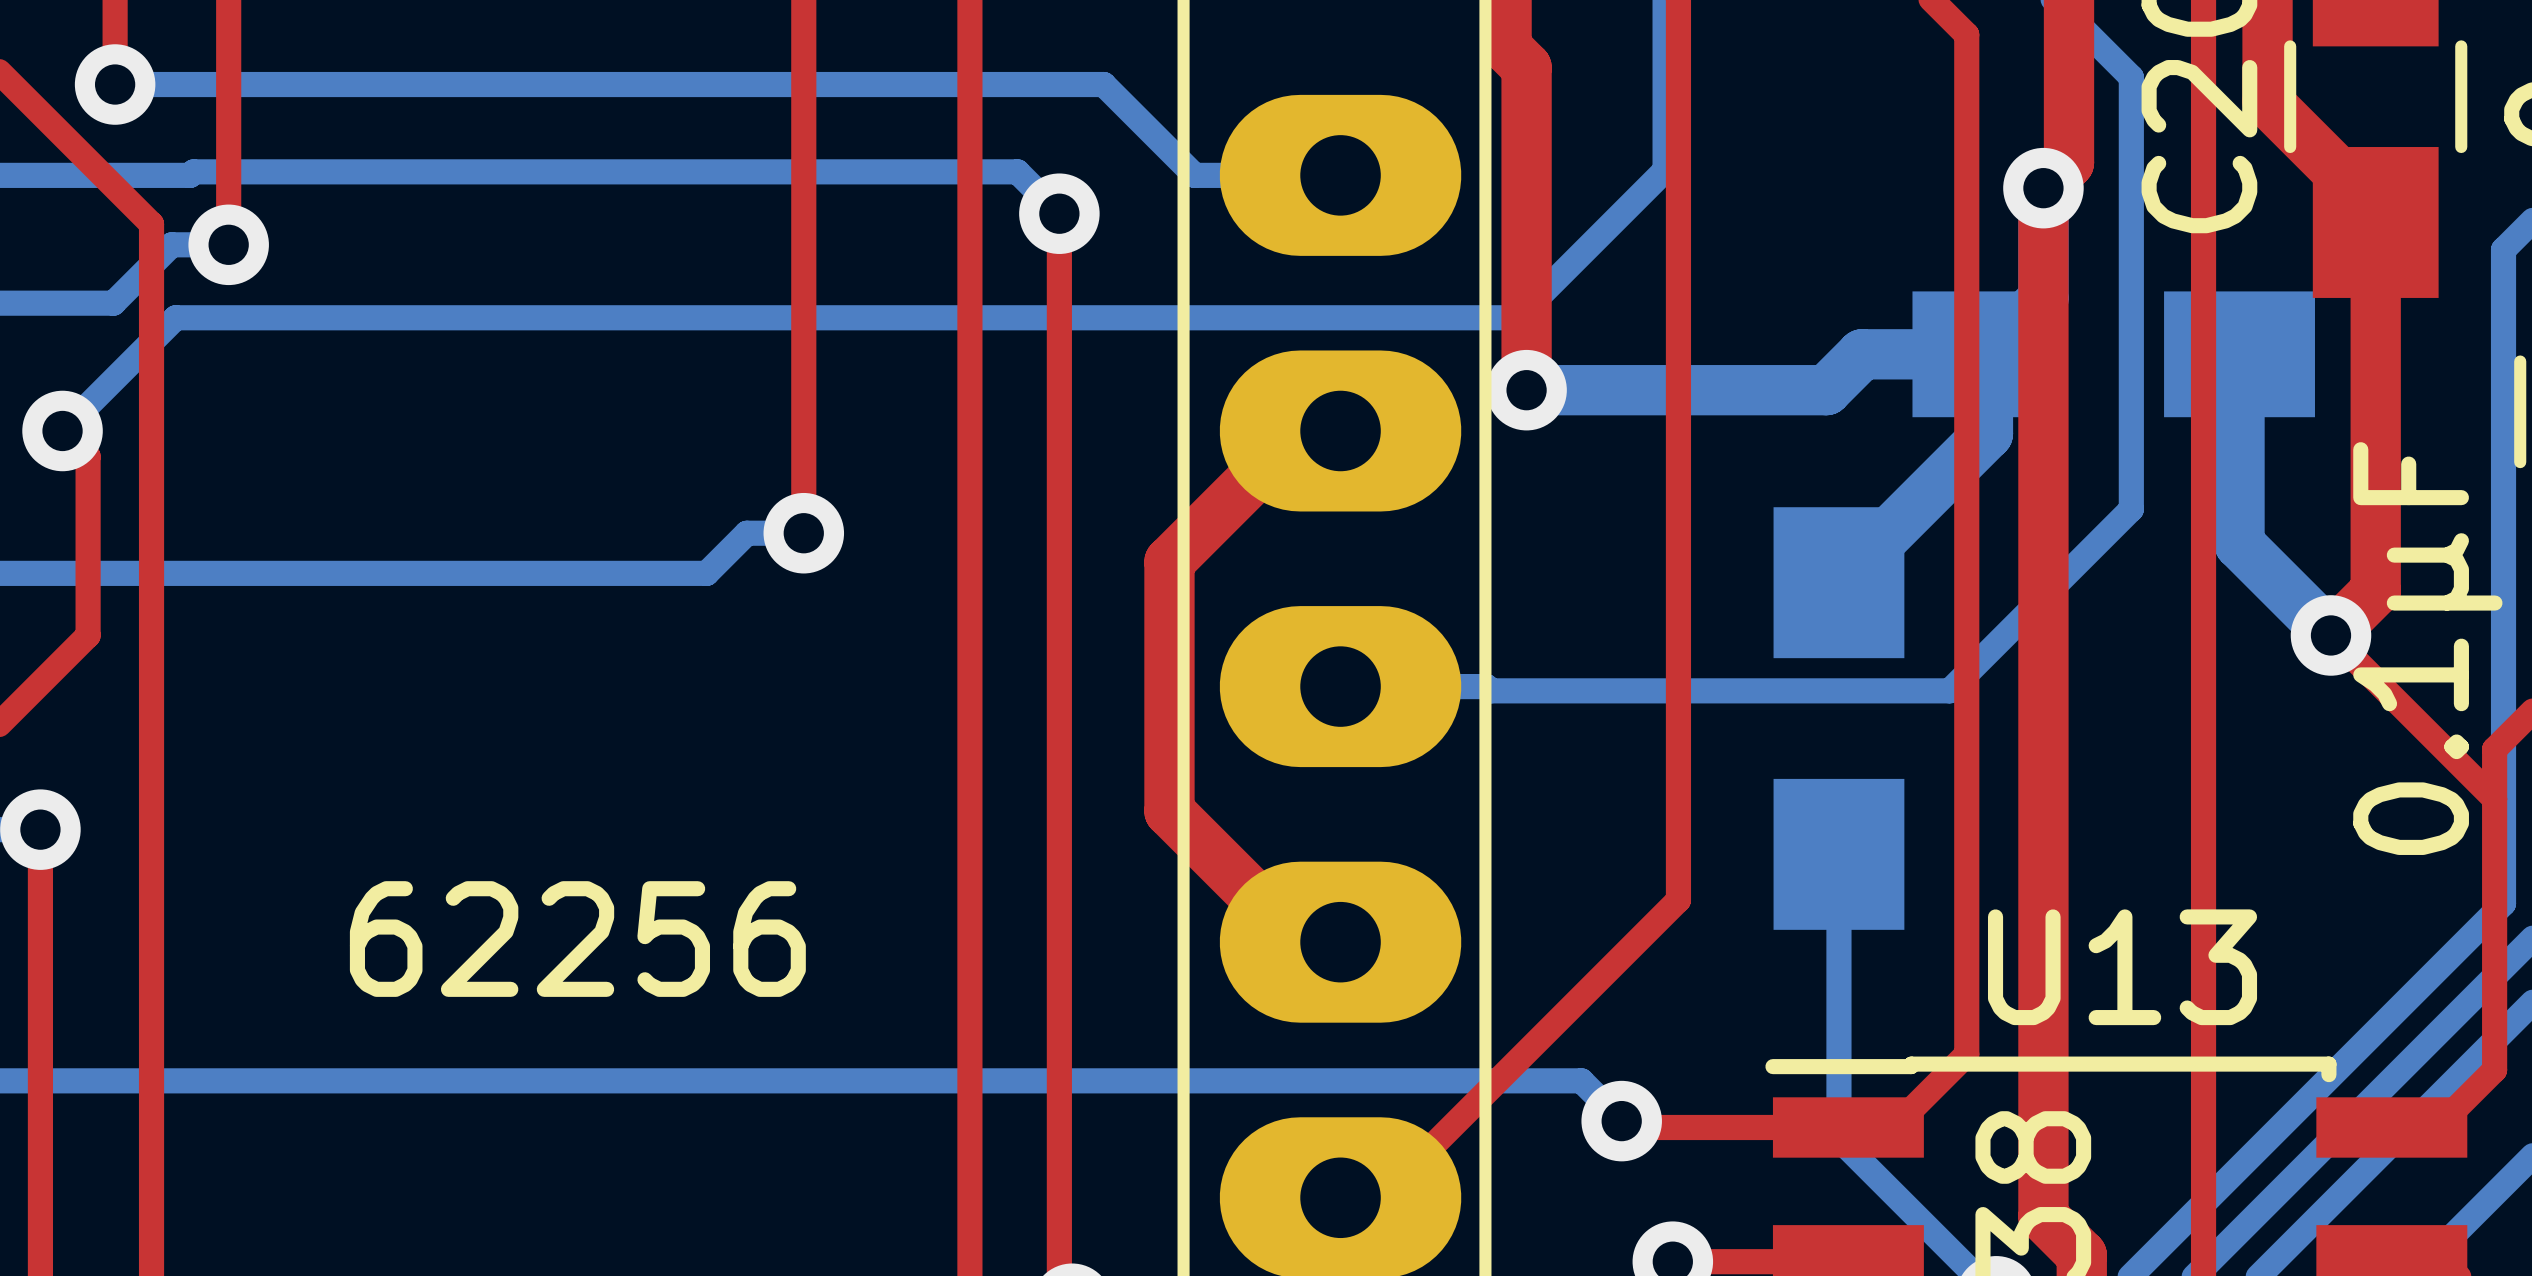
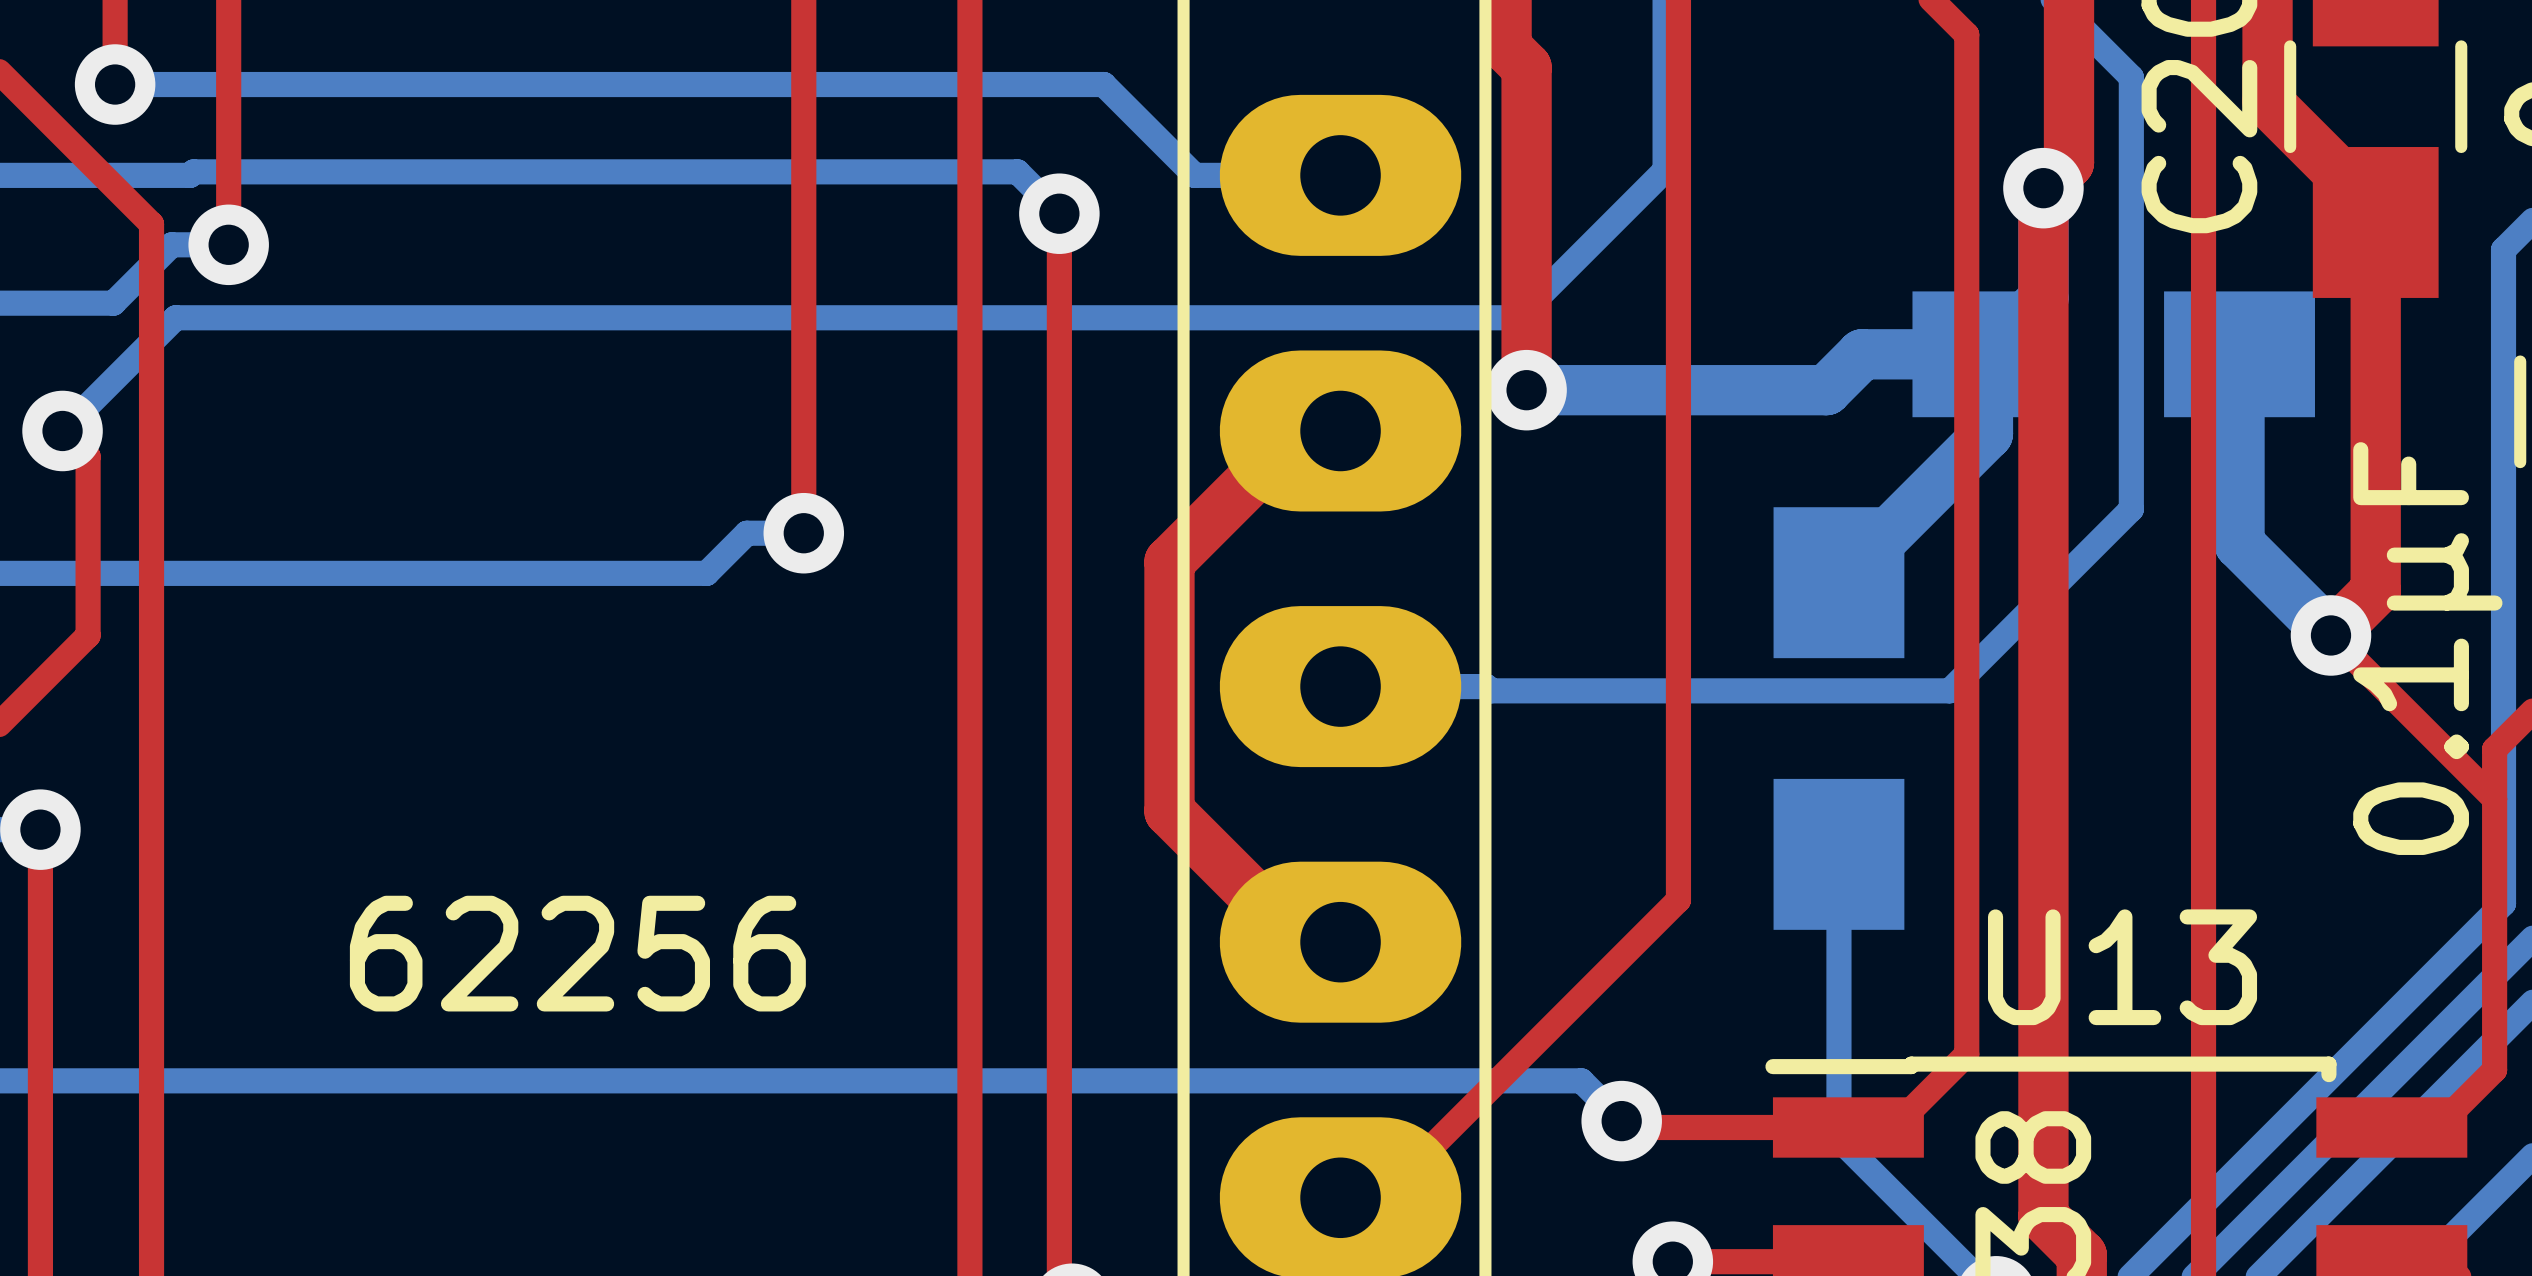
text position: 62256 (577, 939) -> 62256 (577, 953)

